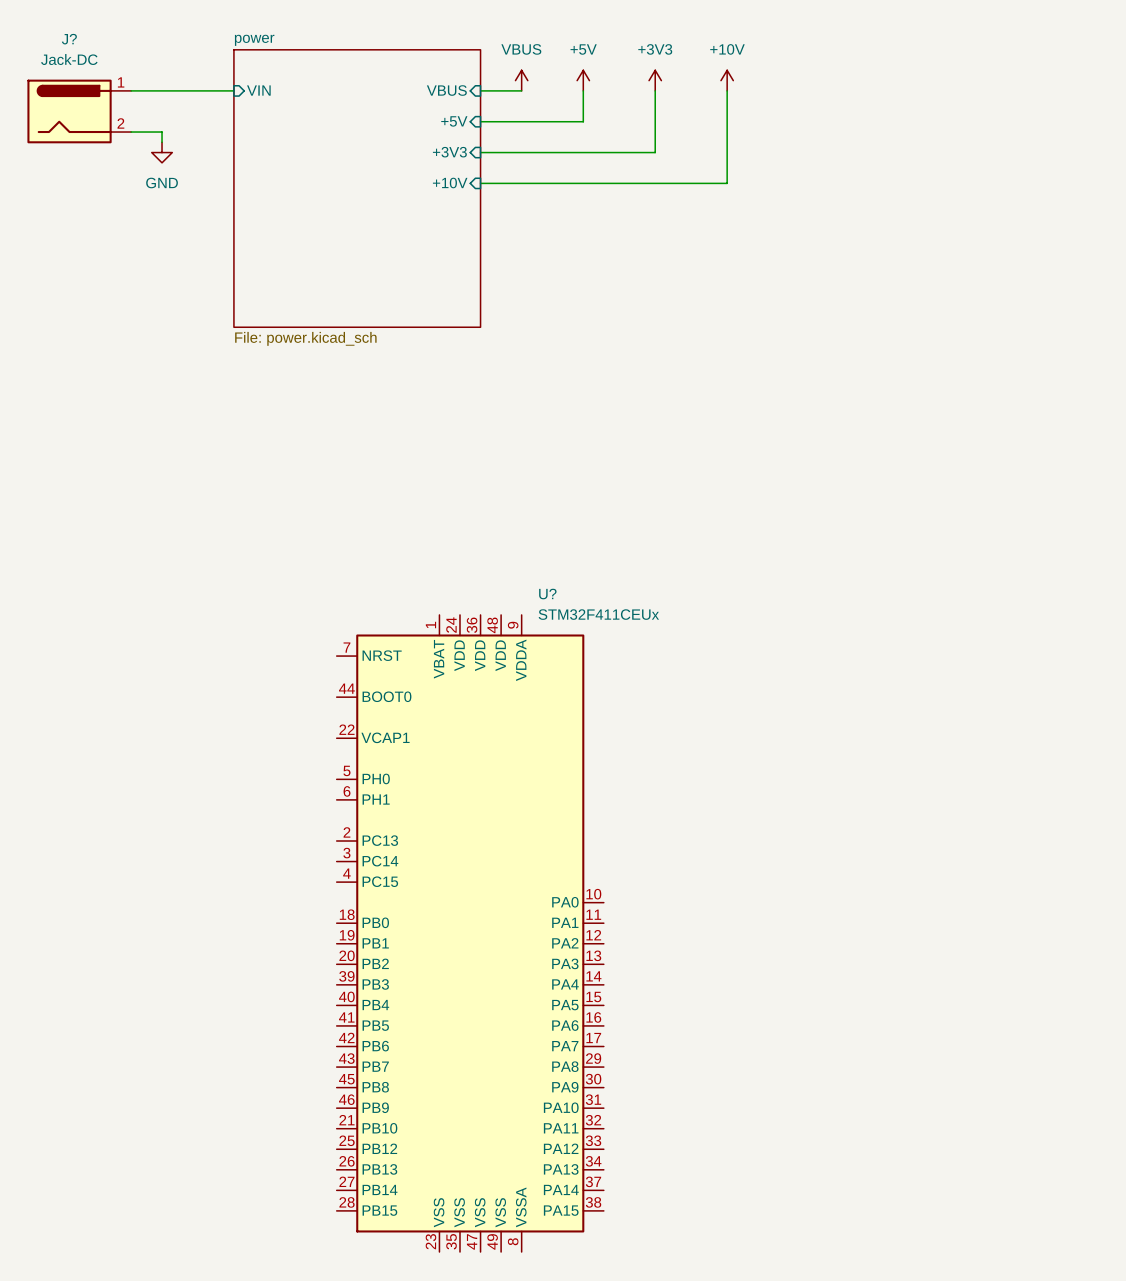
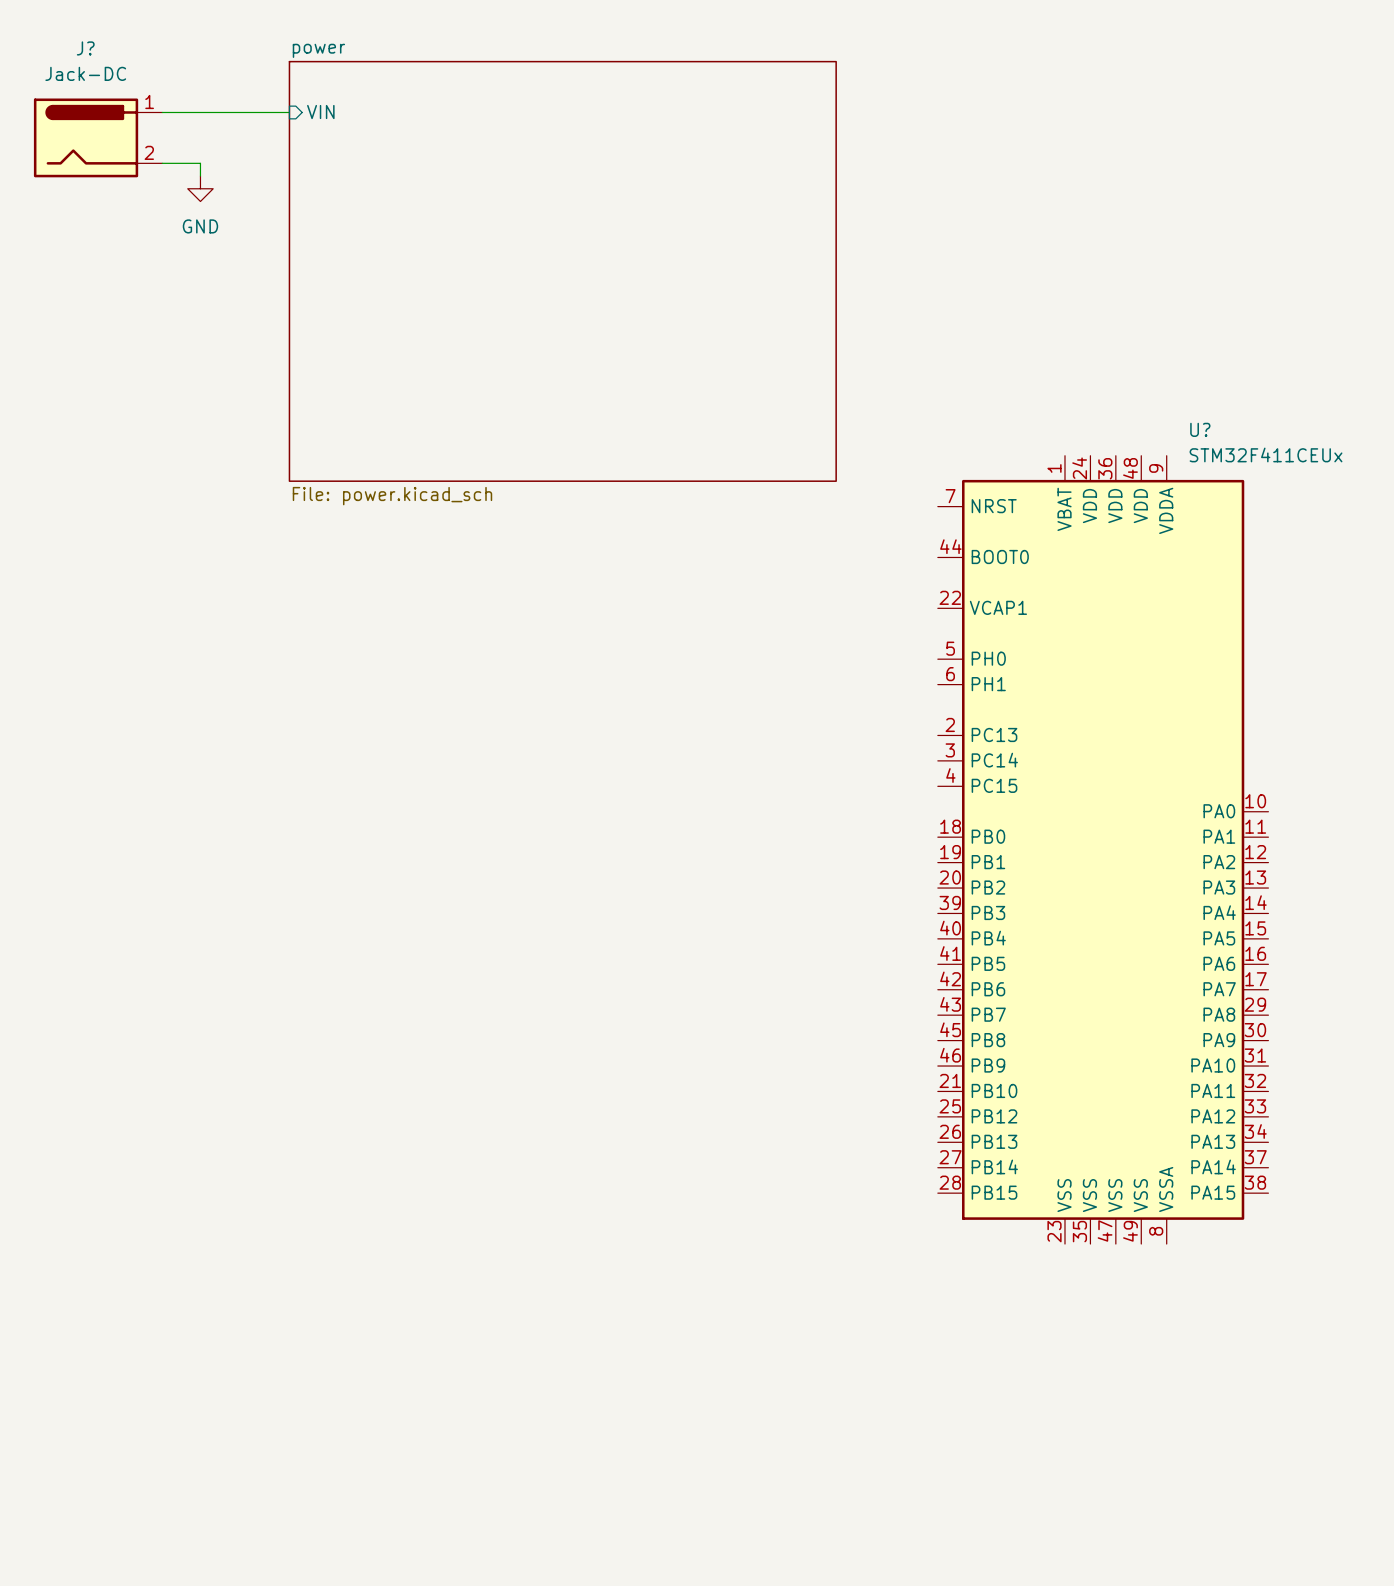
power symbol: VBUS (521, 80) -> none
power symbol: +5V (583, 80) -> none
power symbol: +3V3 (655, 80) -> none
power symbol: +10V (727, 80) -> none
sheet pin: VBUS (446, 90) -> none
wire: (480, 90) (521, 90) -> none
wire: (583, 90) (583, 121) (480, 121) -> none
wire: (655, 90) (655, 152) (480, 152) -> none
wire: (727, 90) (727, 183) (480, 183) -> none
sheet pin: +5V (454, 121) -> none
sheet pin: +3V3 (449, 152) -> none
sheet pin: +10V (450, 183) -> none
sheet power: File: power.kicad_sch (357, 188) -> none
sheet power: none -> File: power.kicad_sch (562, 271)
U?: none -> STM32F411CEUx (1103, 849)
U?: STM32F411CEUx (470, 933) -> none

